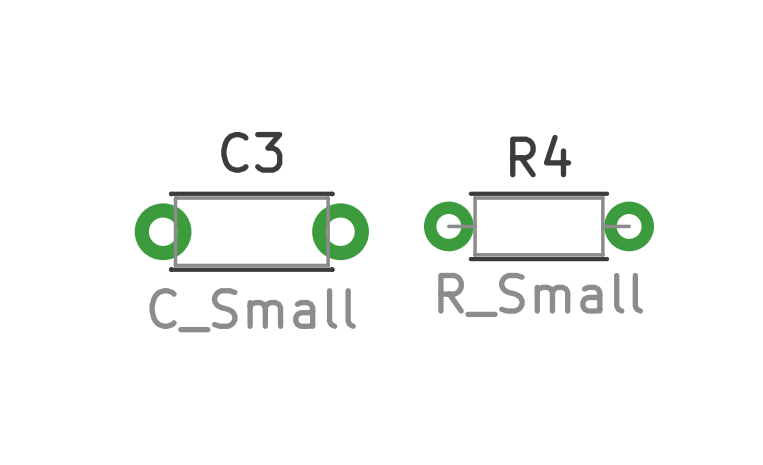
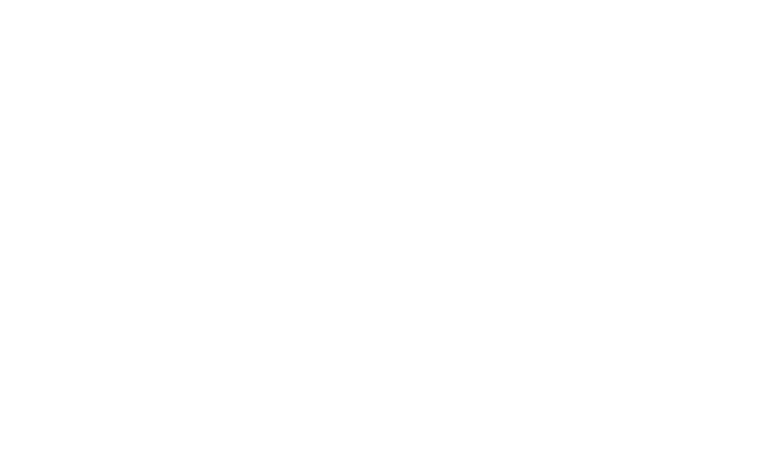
R4: R_Small (538, 226) -> none
C3: C_Small (251, 231) -> none

